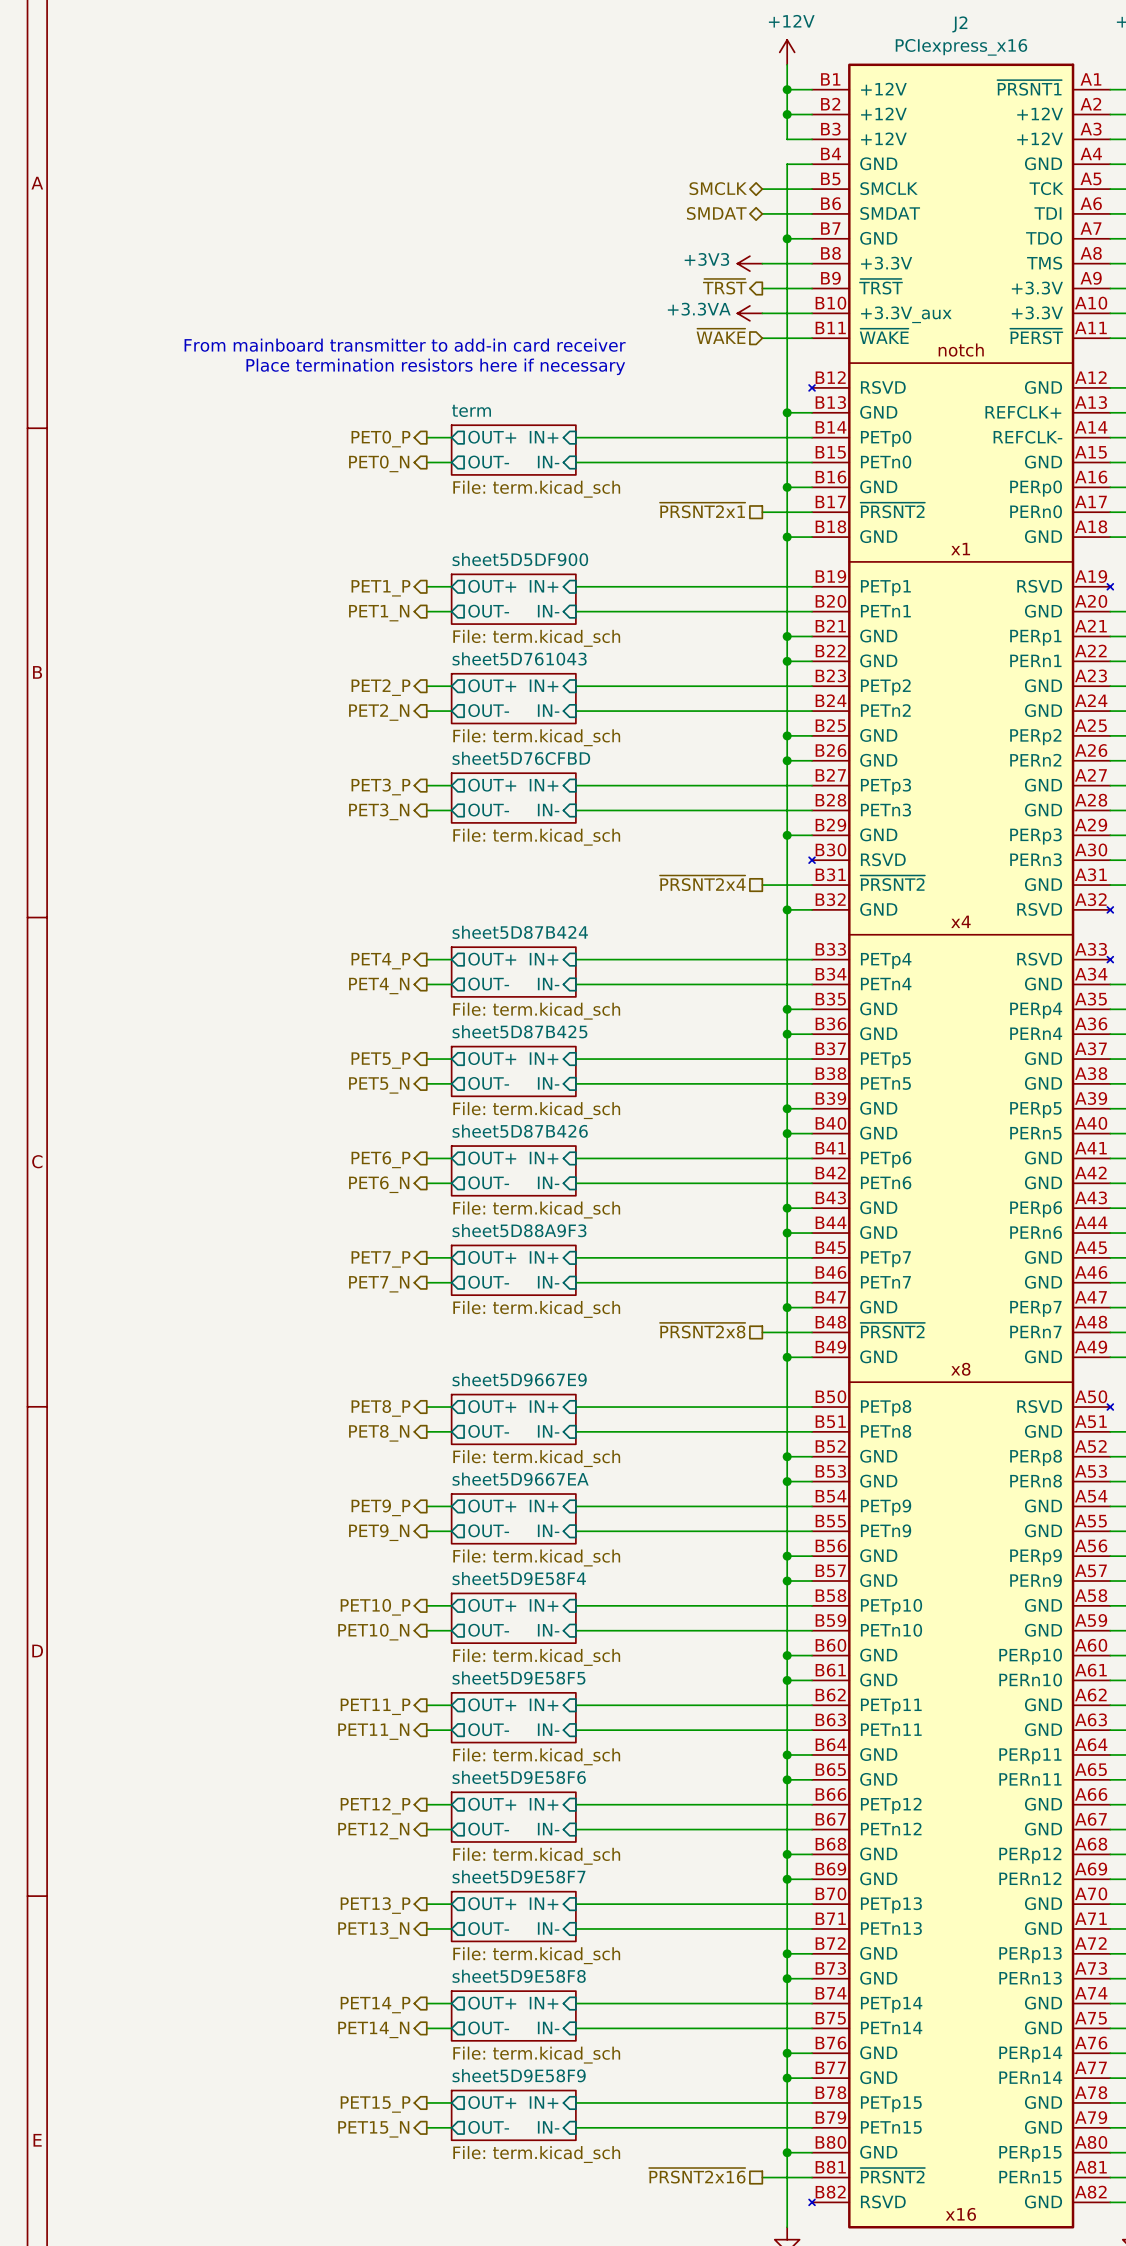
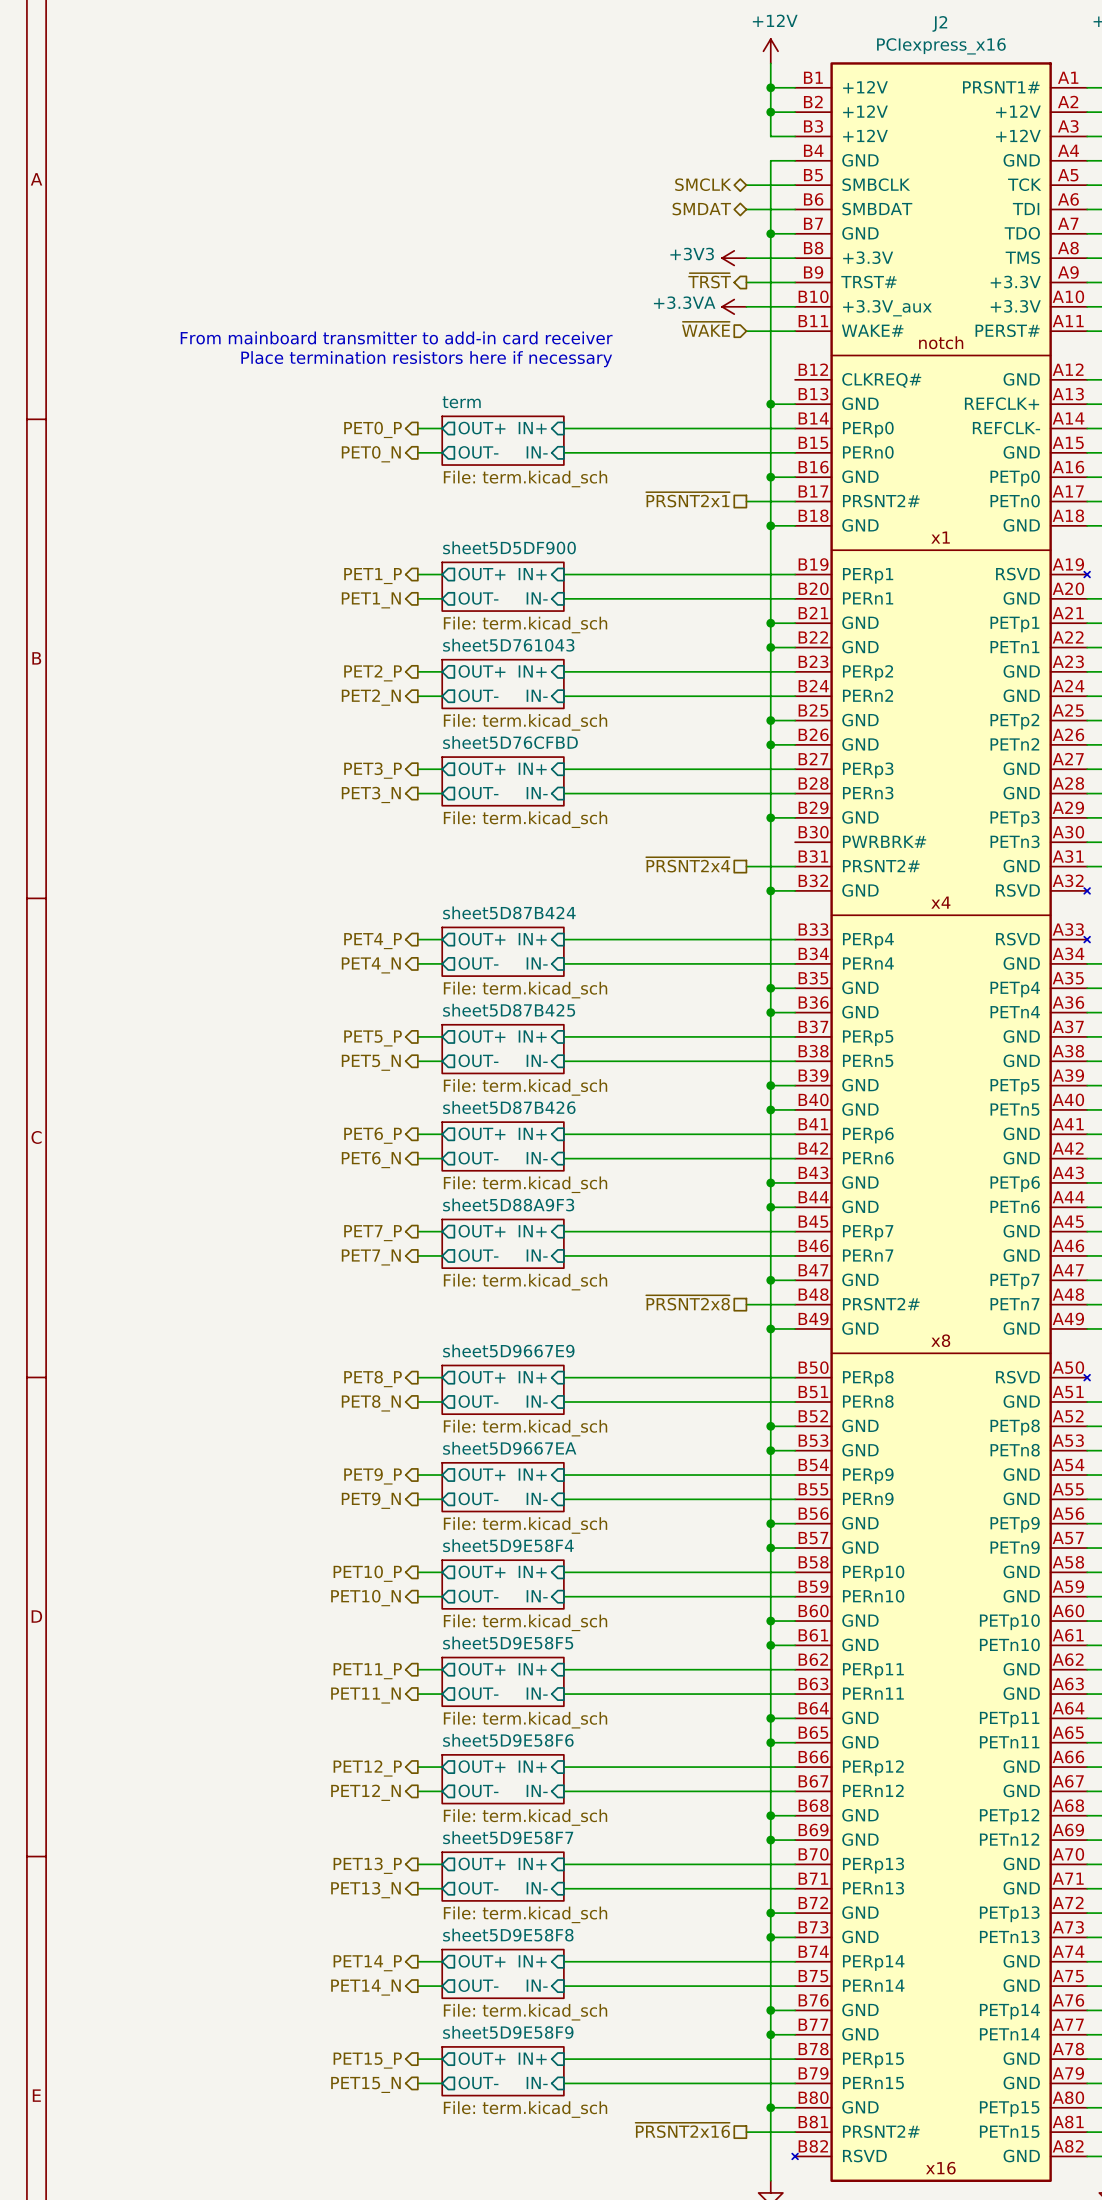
J2 symbol: [809, 63, 1114, 2229] -> [792, 62, 1091, 2183]

